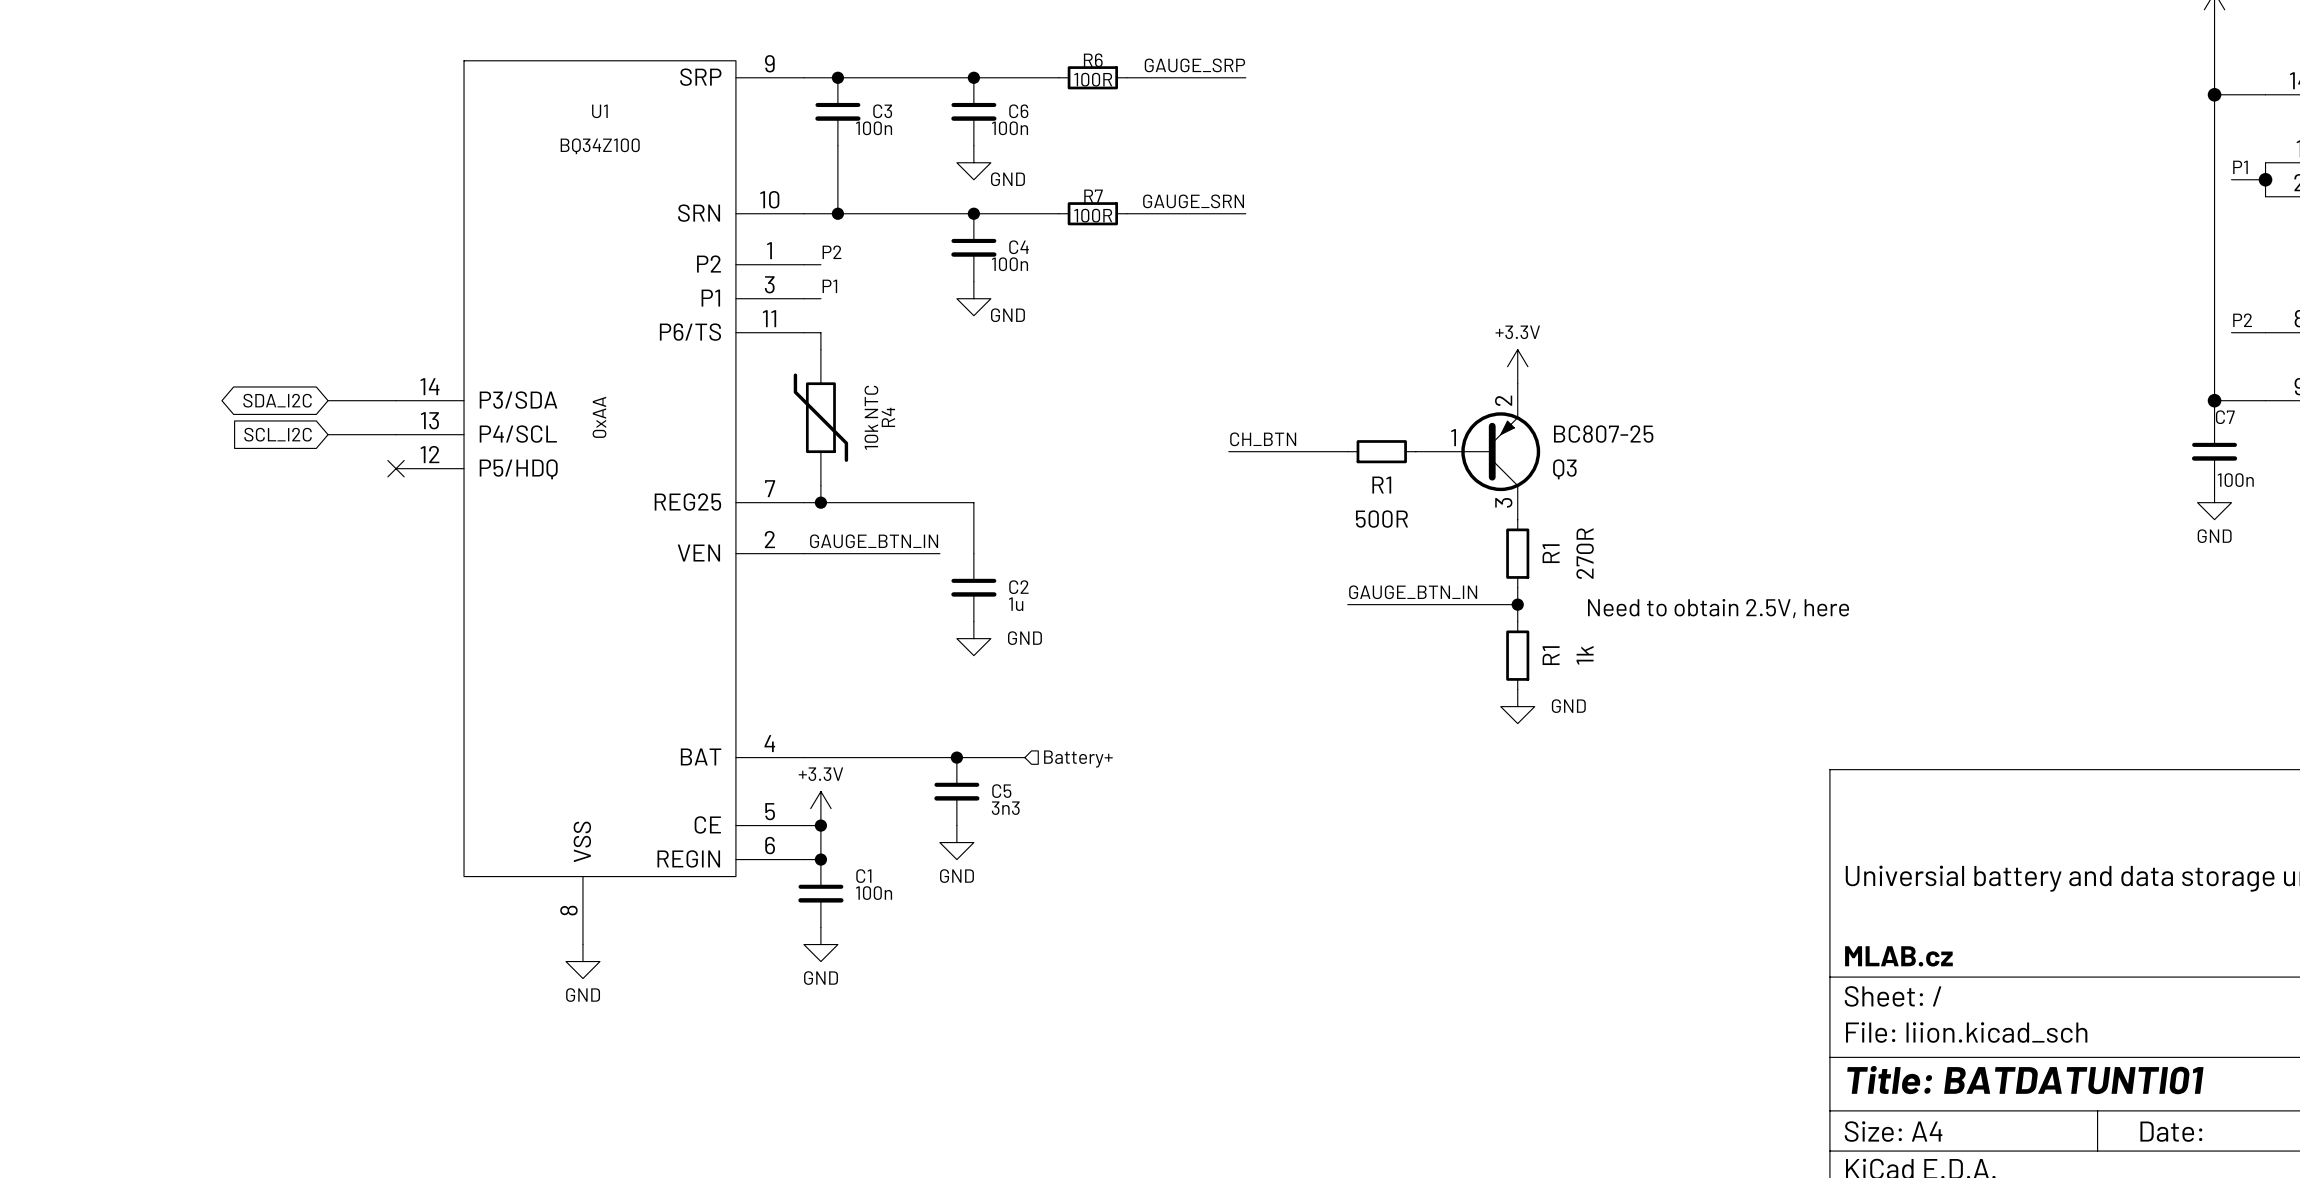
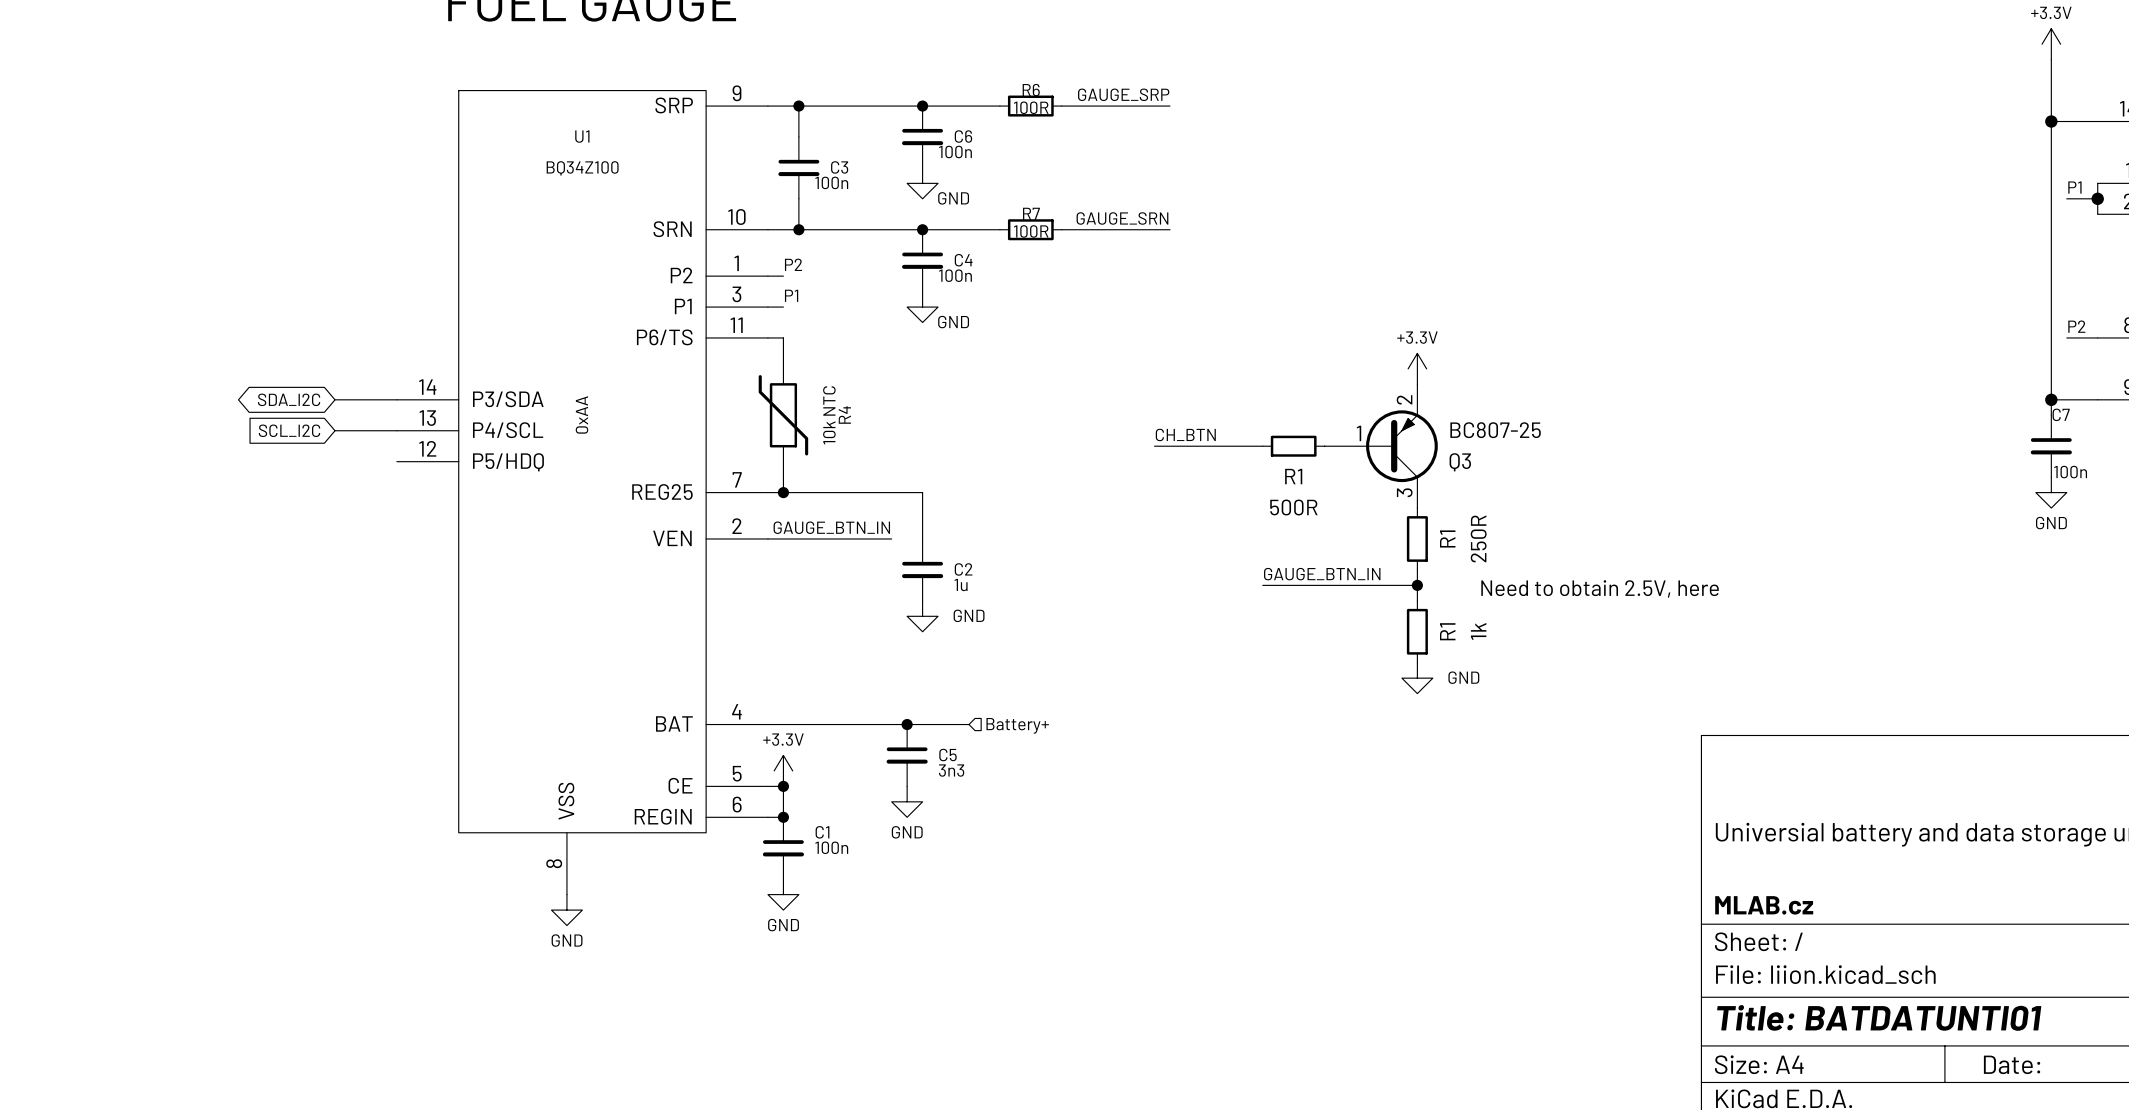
C3 position: (837, 111) -> (798, 167)
no-connect mark: (396, 468) -> none
R1 value: 270R (1585, 553) -> 250R (1478, 538)

